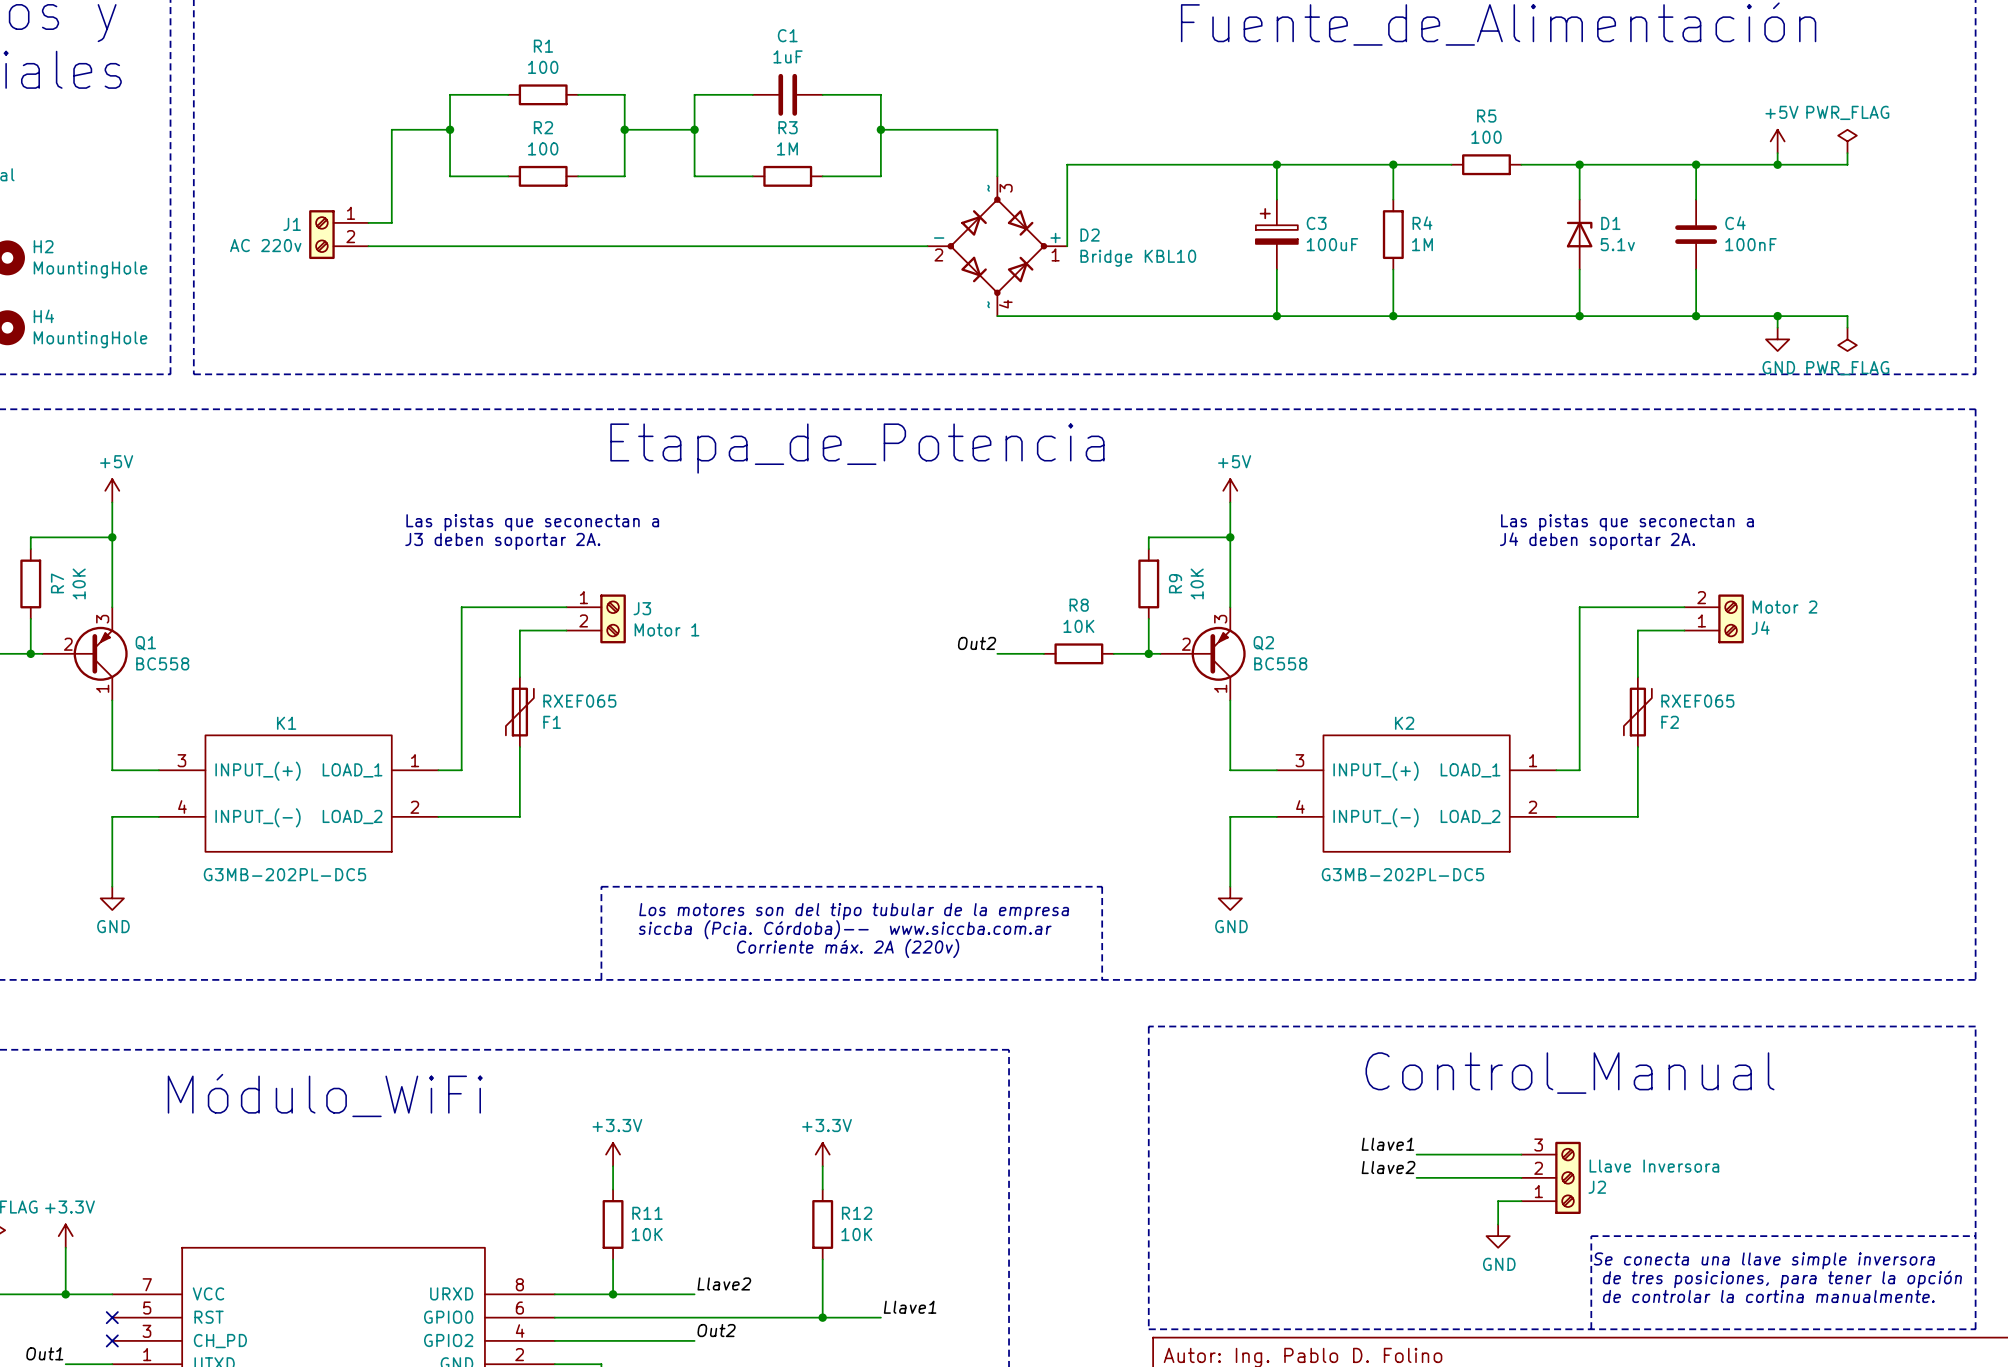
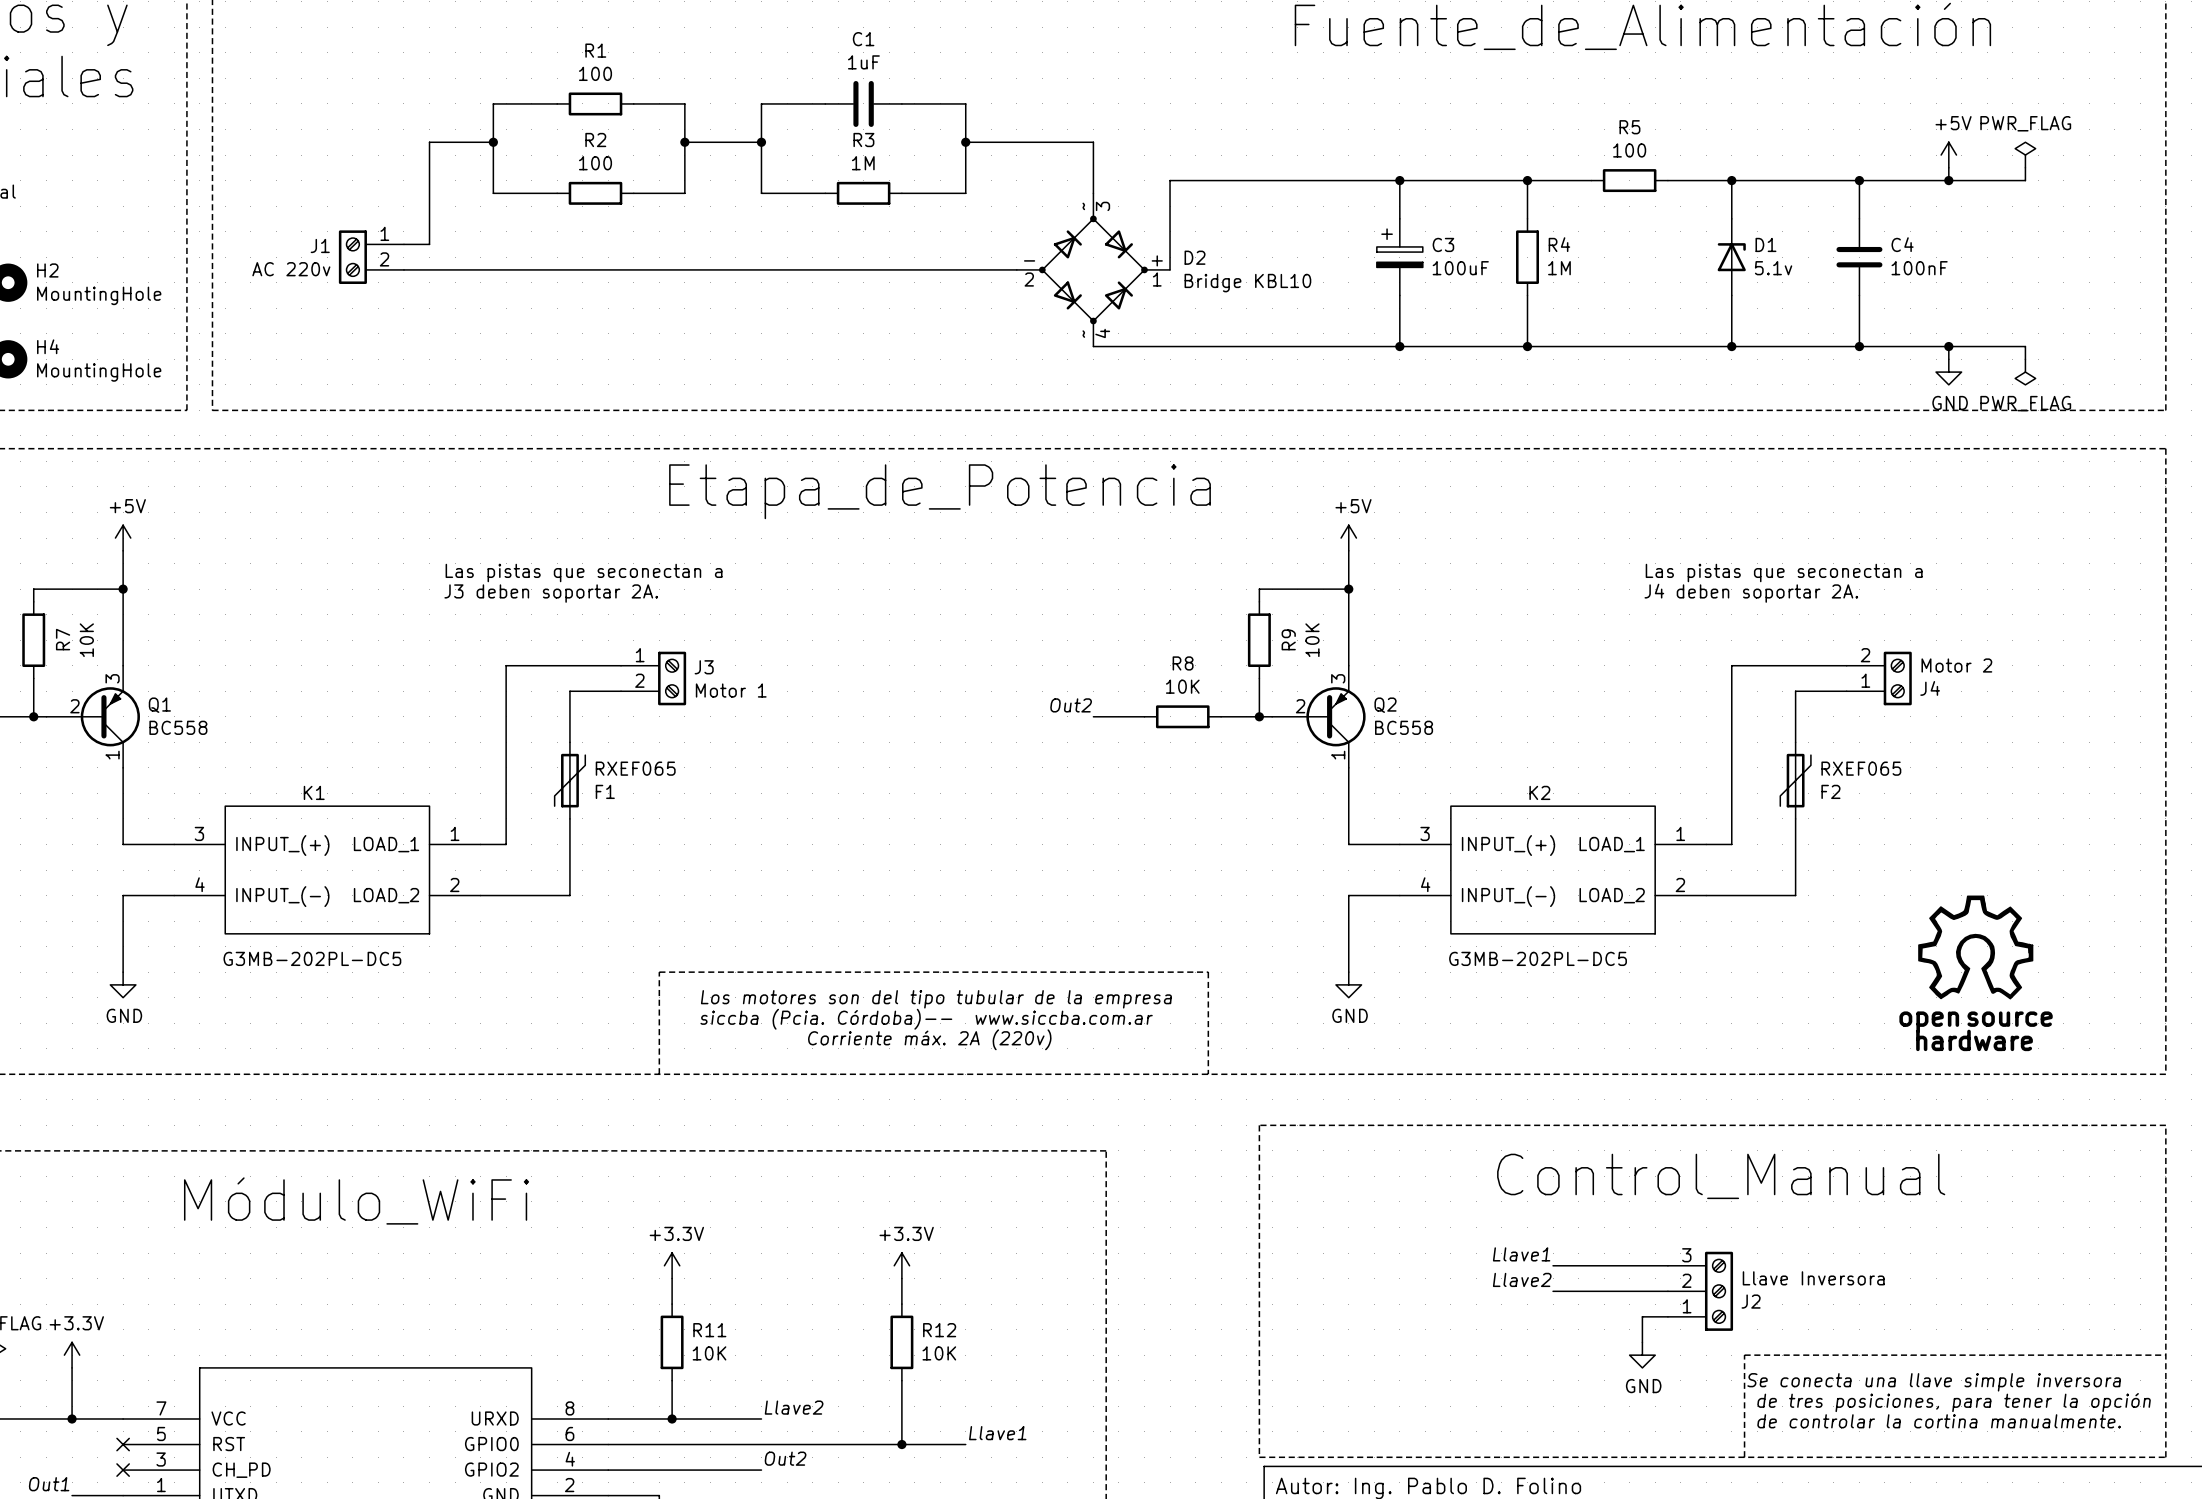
power symbol: none -> (1975, 947)

